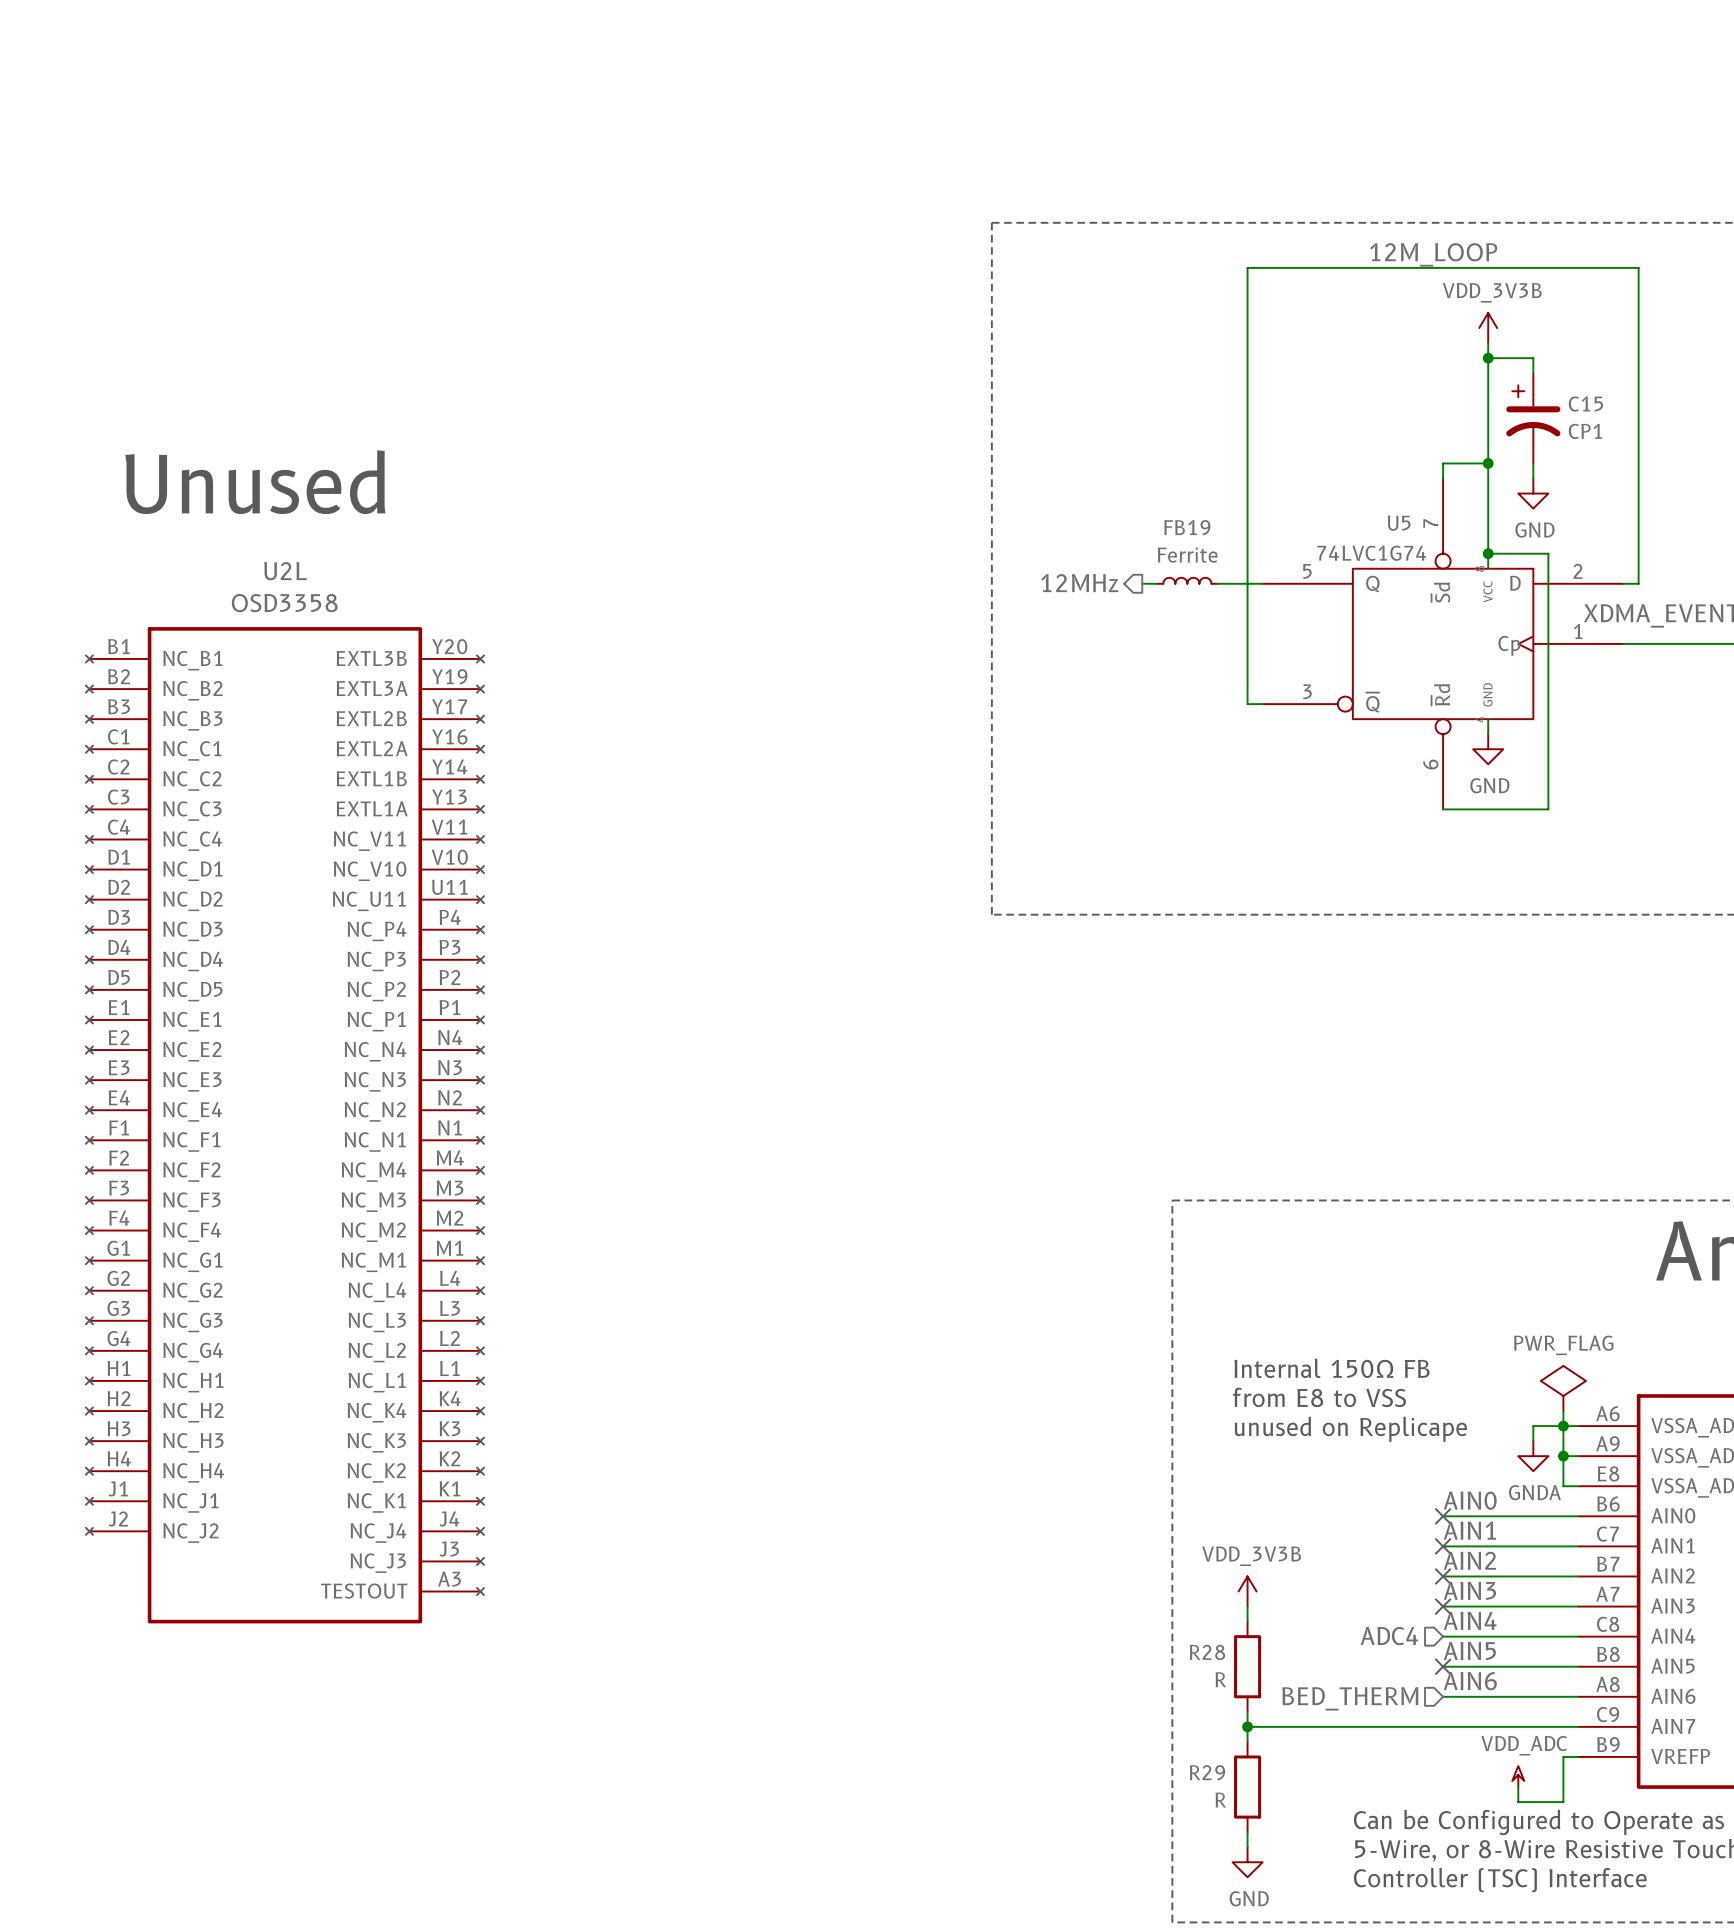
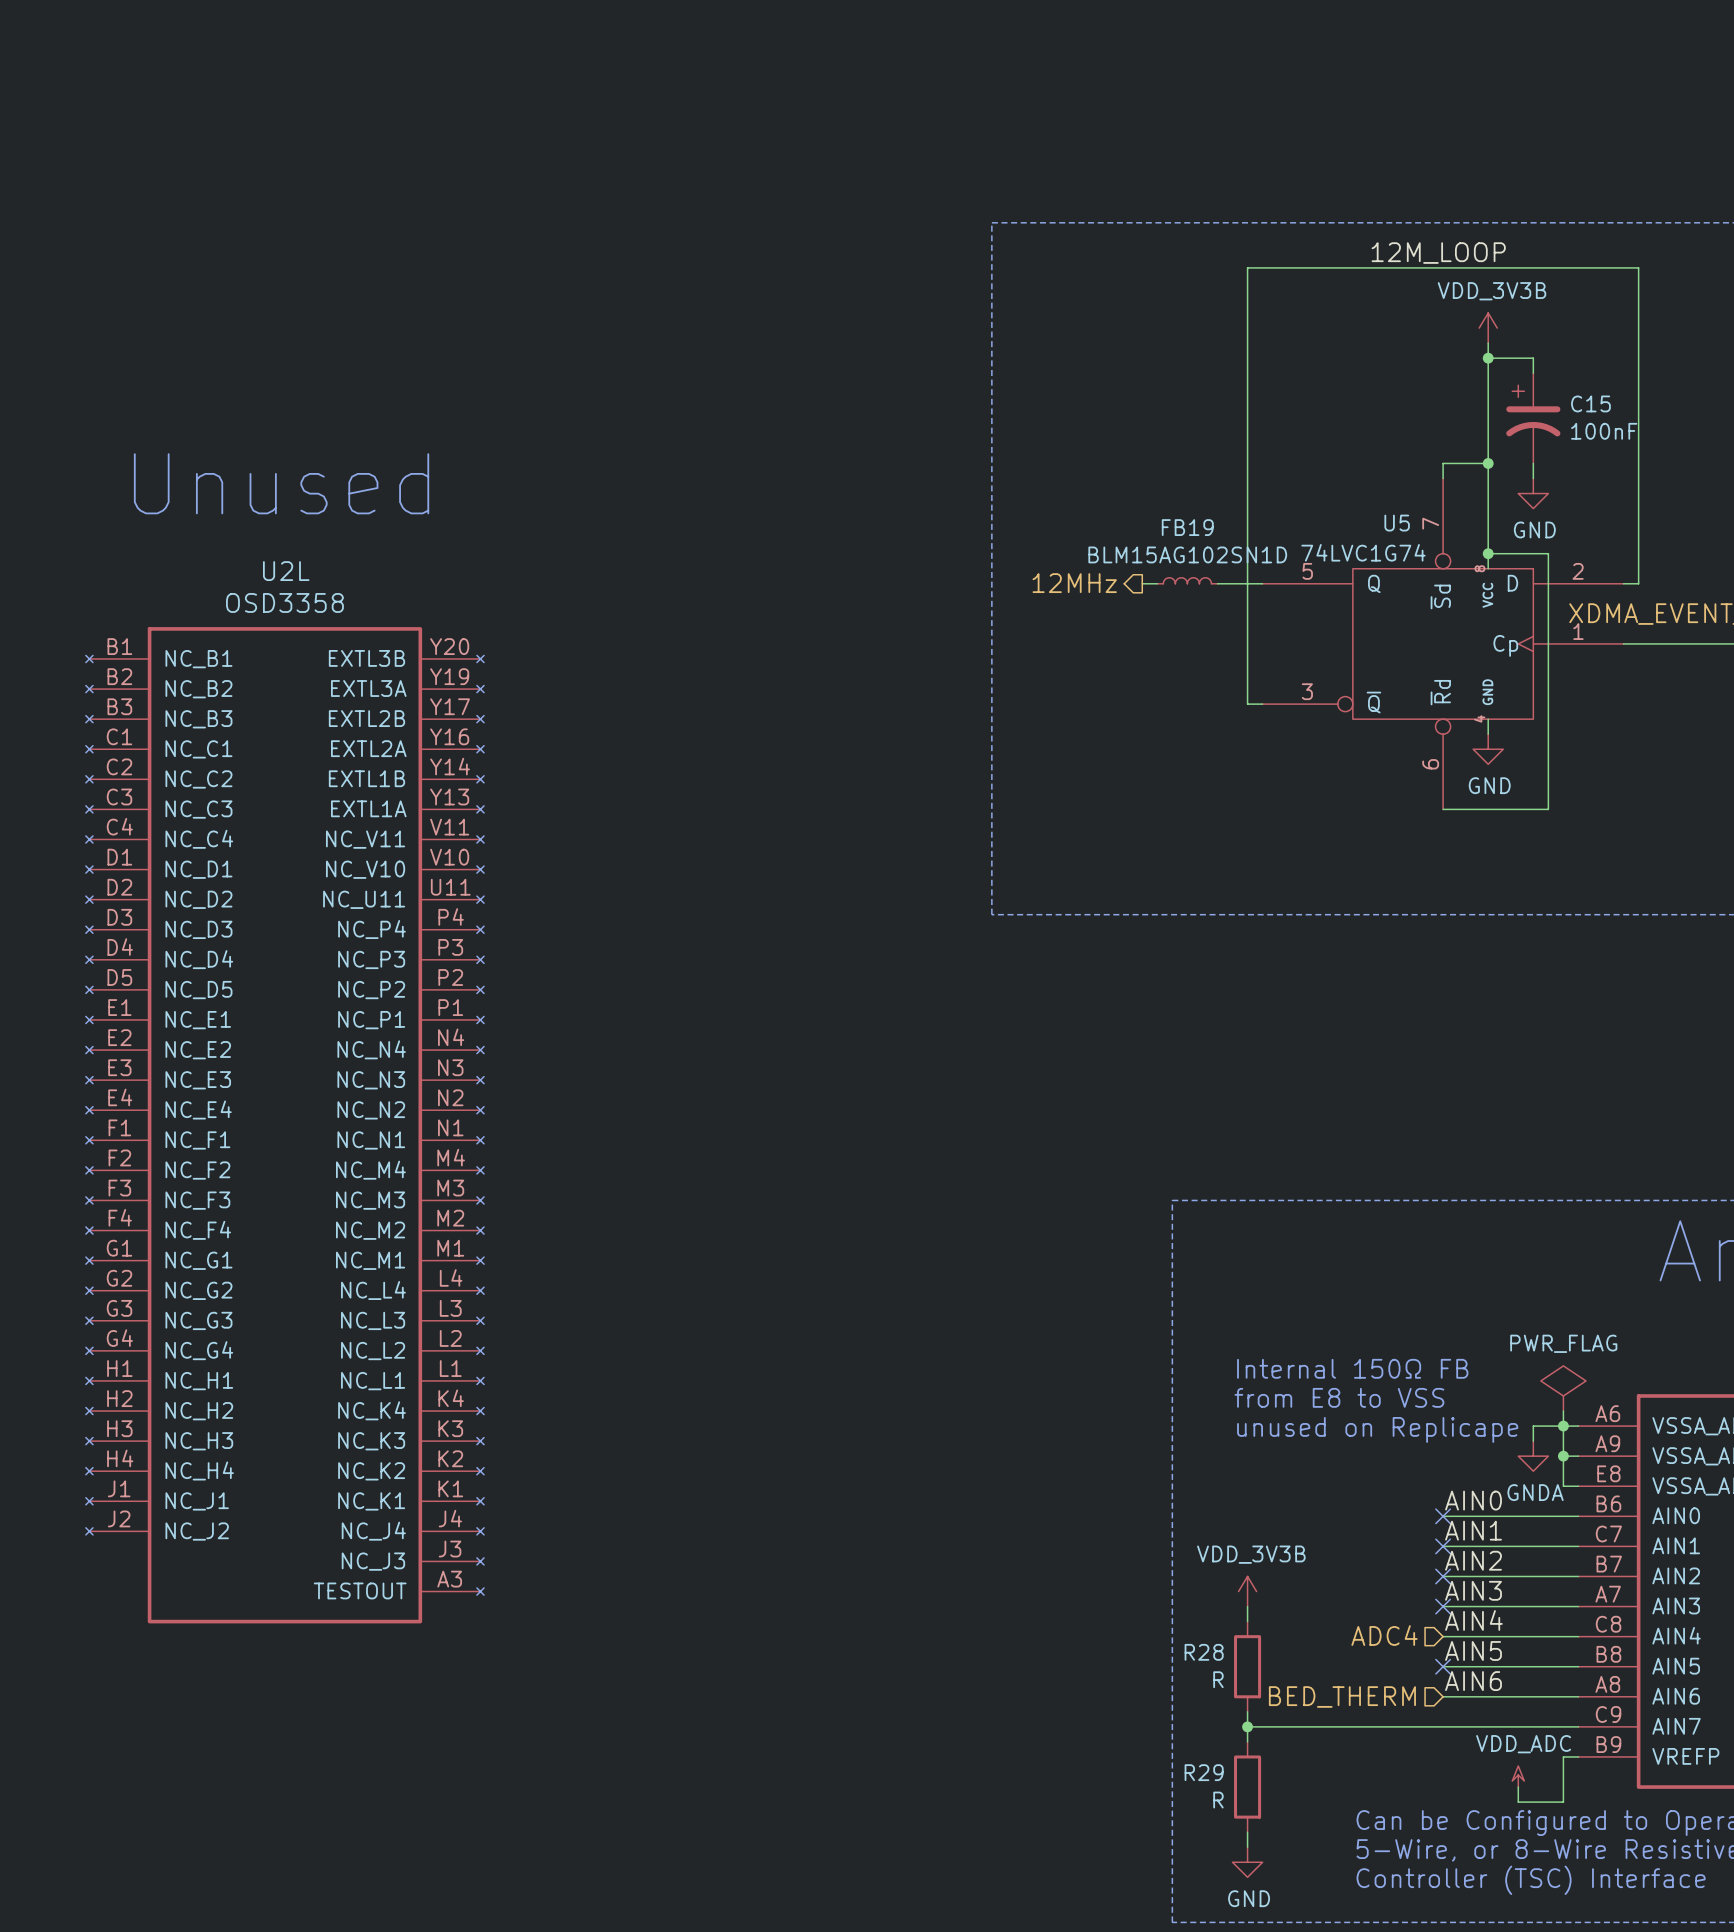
C15 value: CP1 (1585, 431) -> 100nF (1604, 431)
FB19 value: Ferrite (1187, 555) -> BLM15AG102SN1D (1187, 554)

